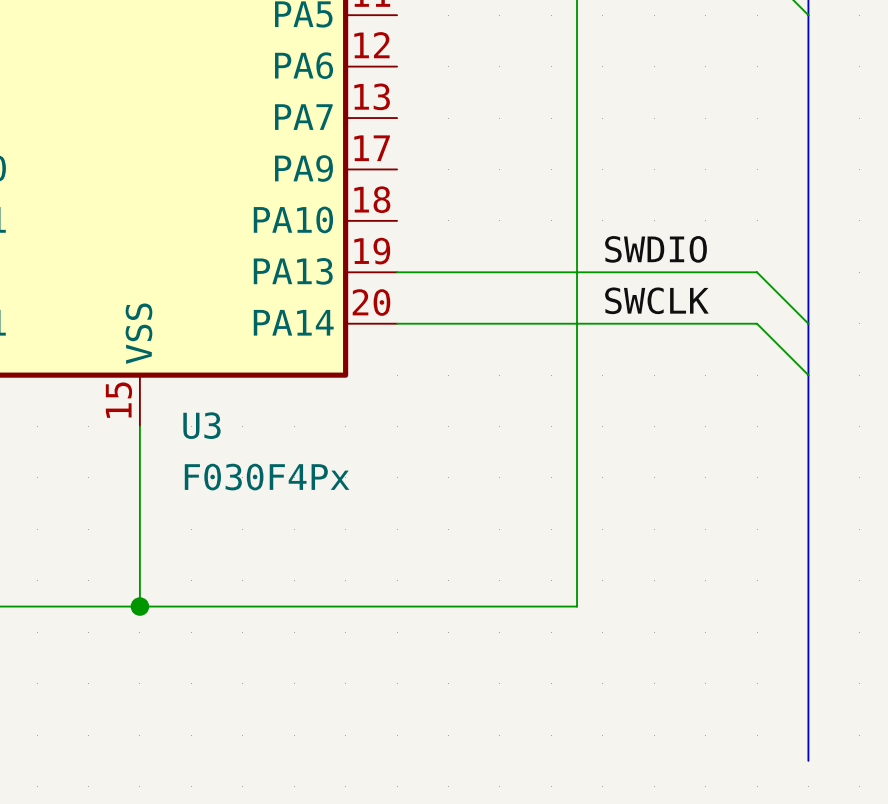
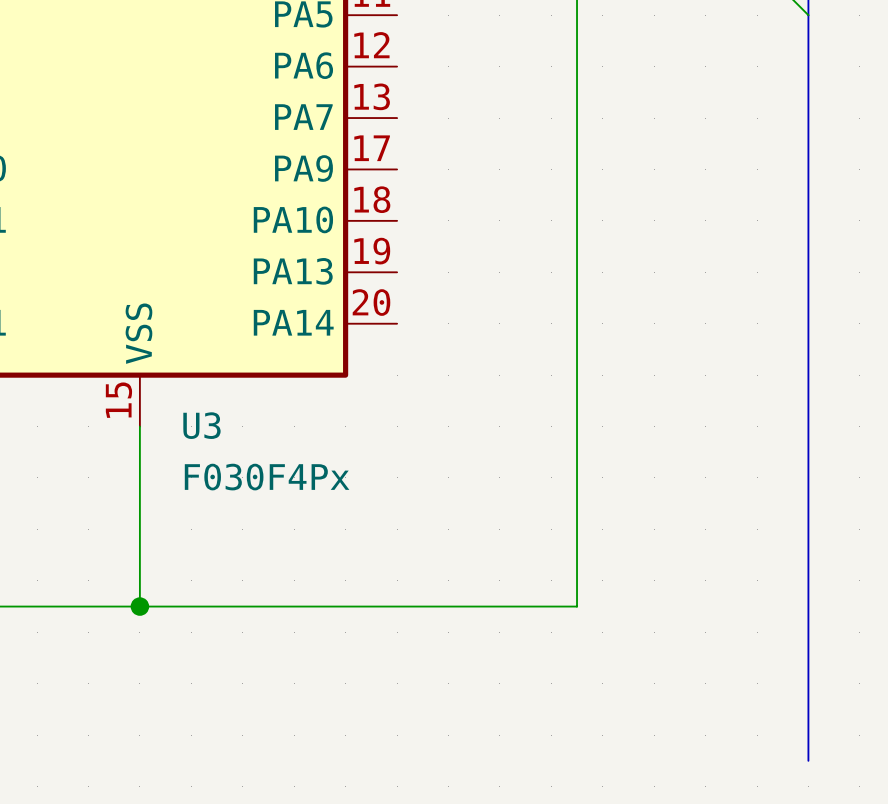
label: SWDIO (656, 249) -> none
wire: (397, 272) (757, 272) (808, 323) -> none
label: SWCLK (656, 300) -> none
wire: (397, 323) (757, 323) (808, 375) -> none

